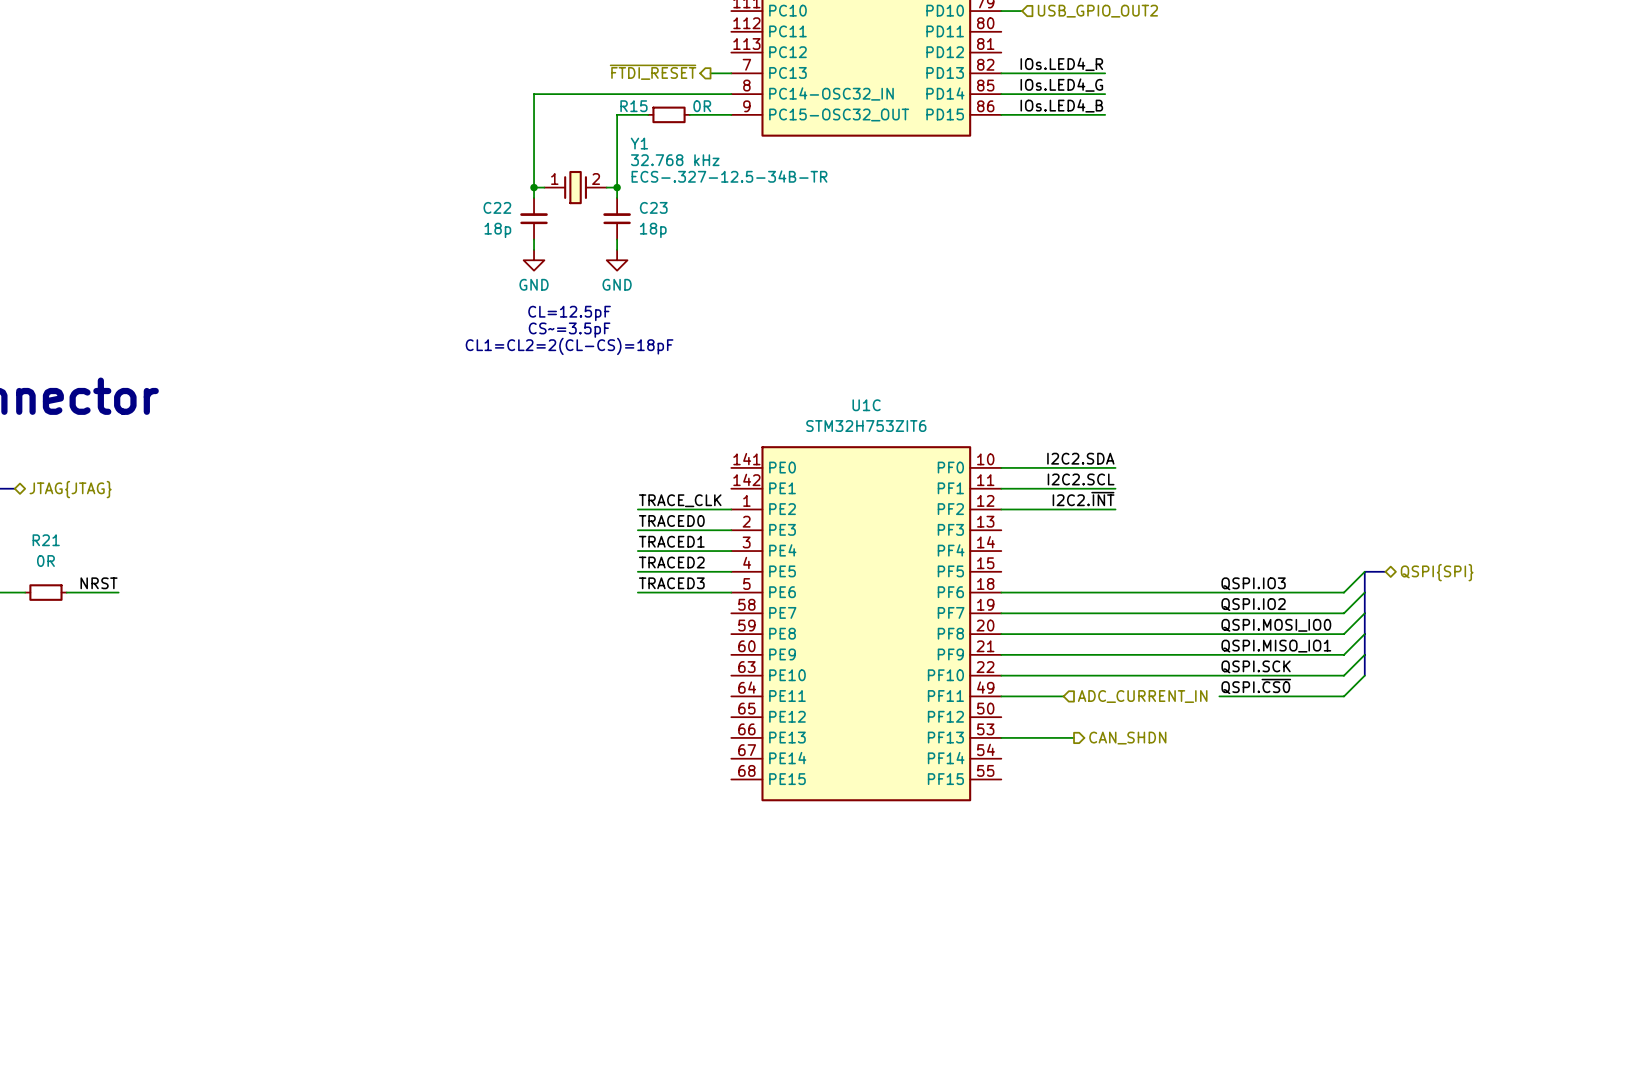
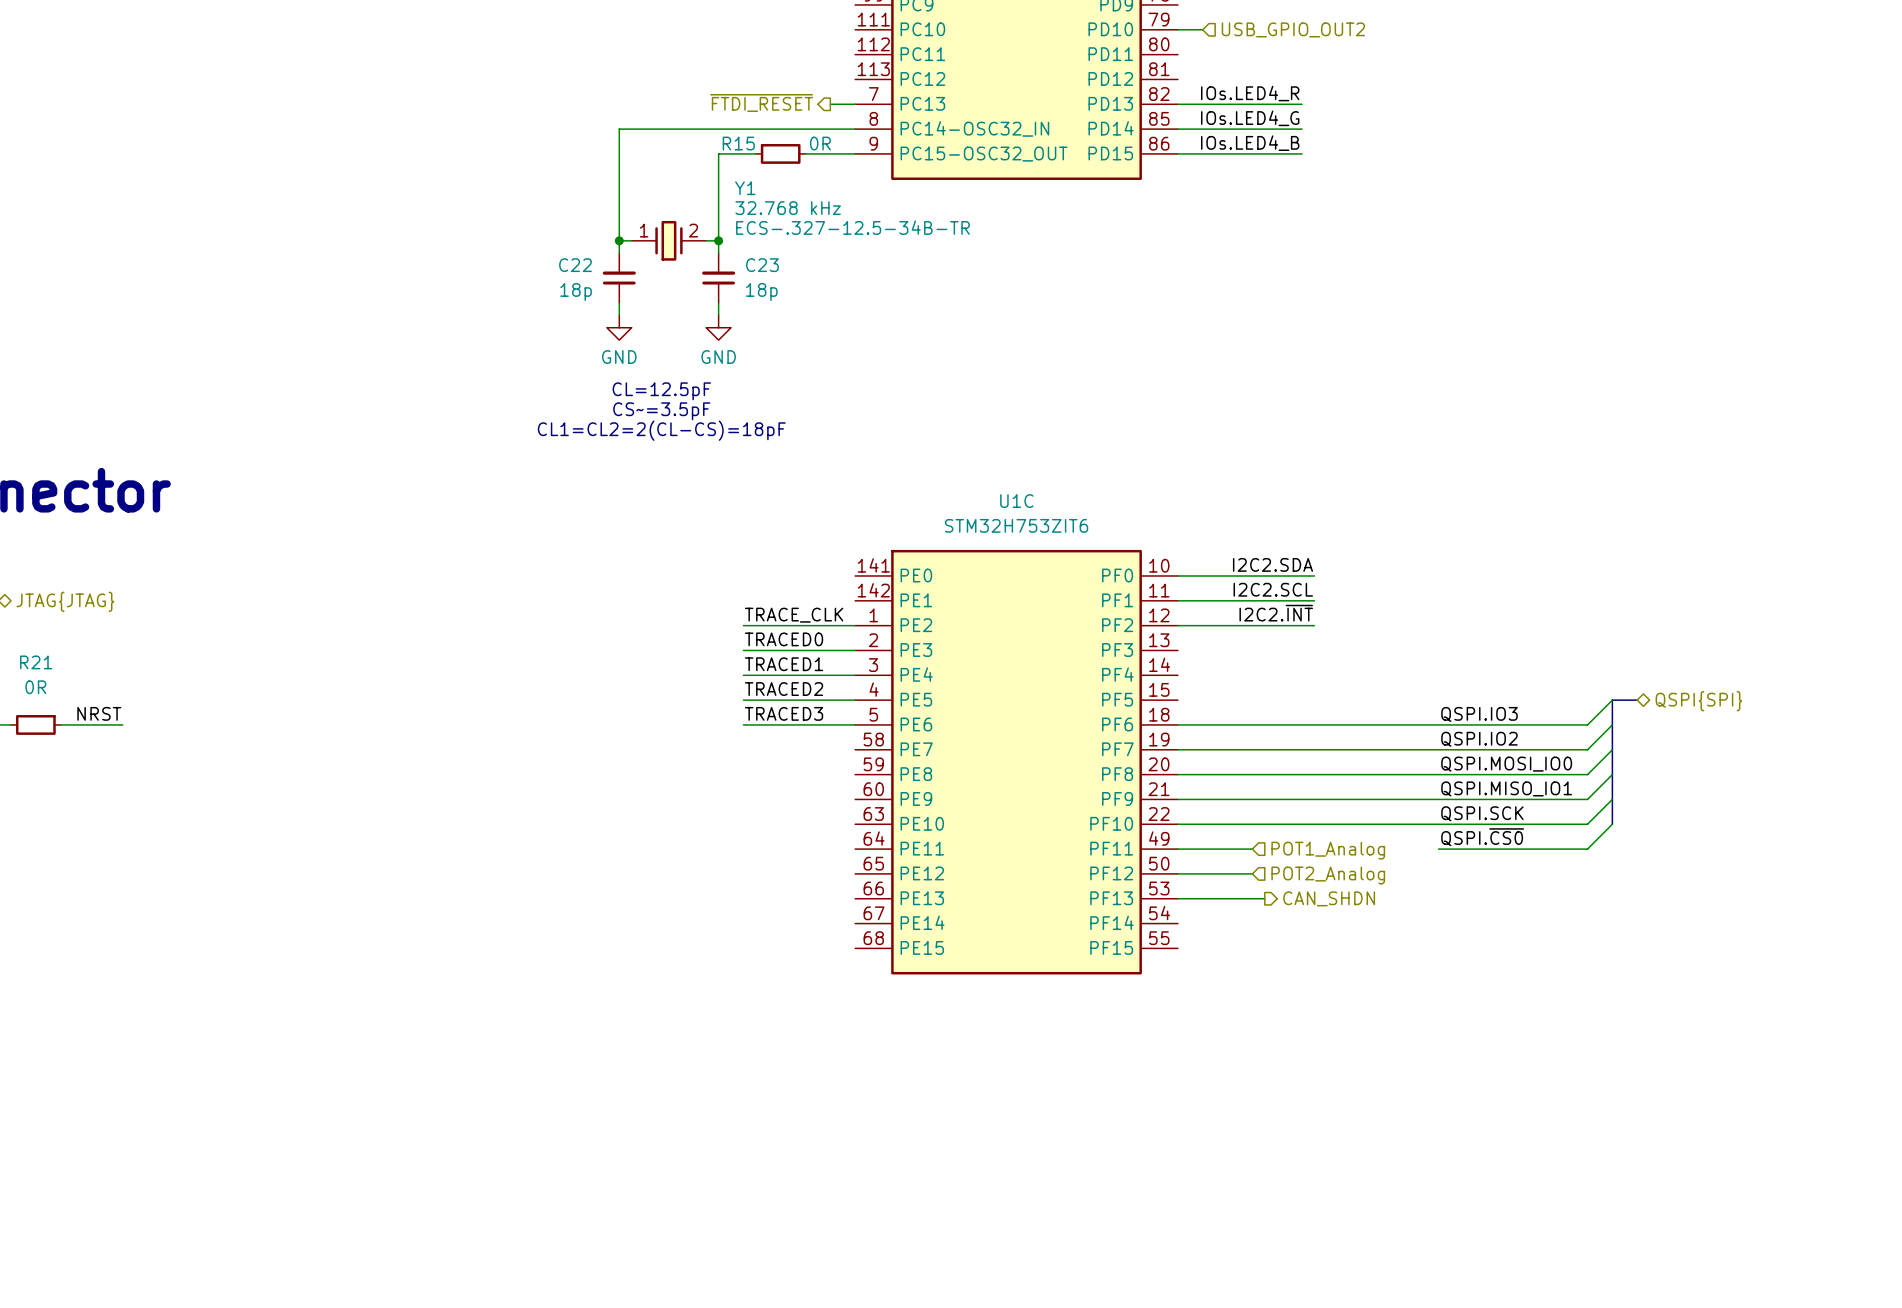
hierarchical label: ADC_CURRENT_IN (1142, 696) -> POT1_Analog (1328, 850)
wire: none -> (1177, 873) (1252, 873)
hierarchical label: none -> POT2_Analog (1328, 875)

